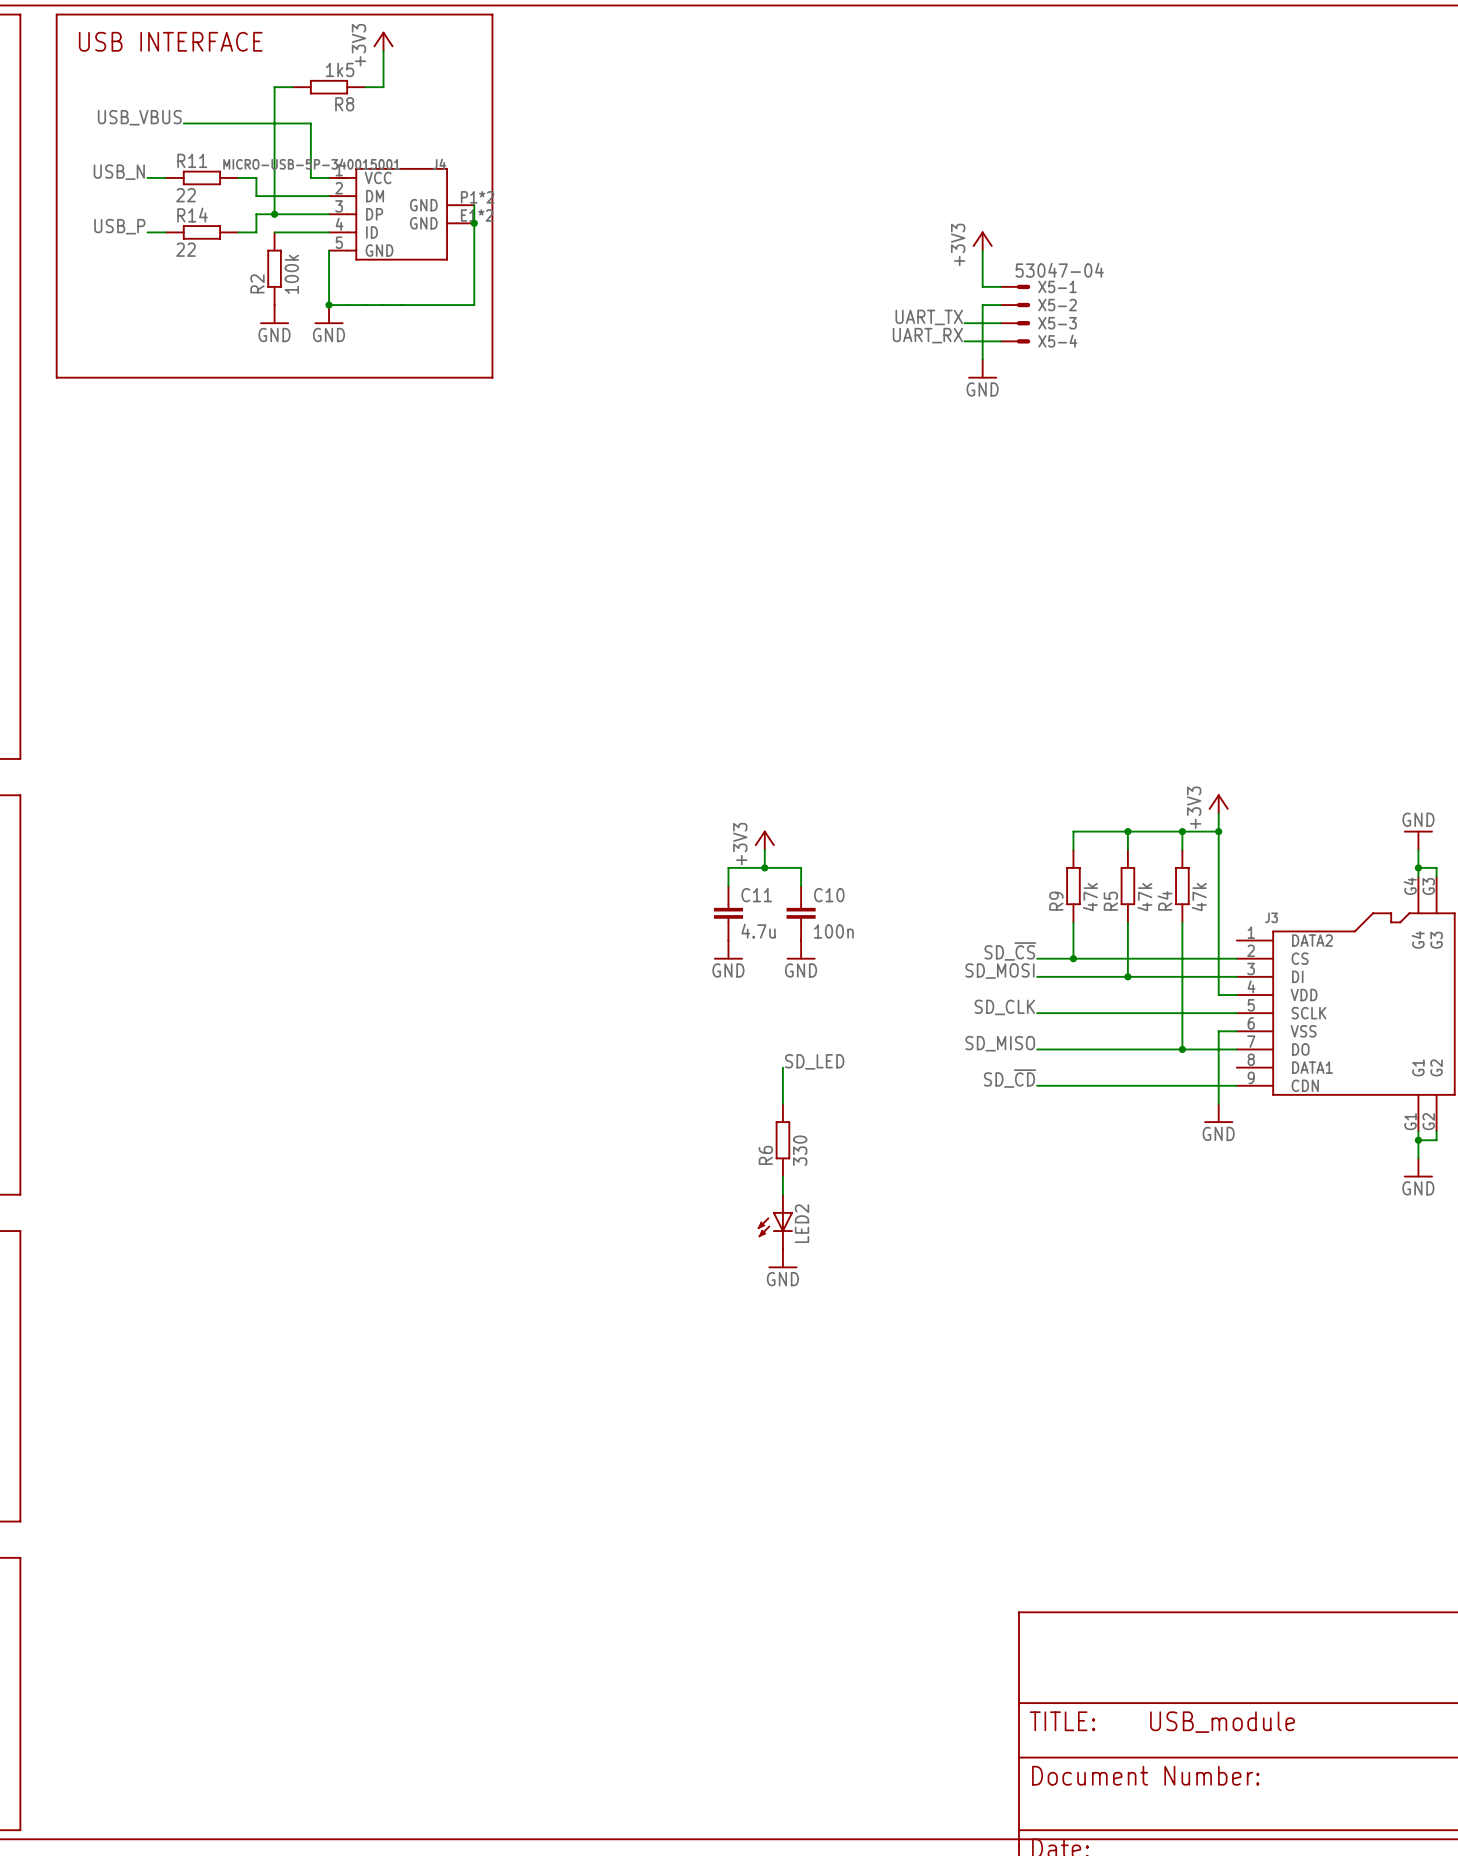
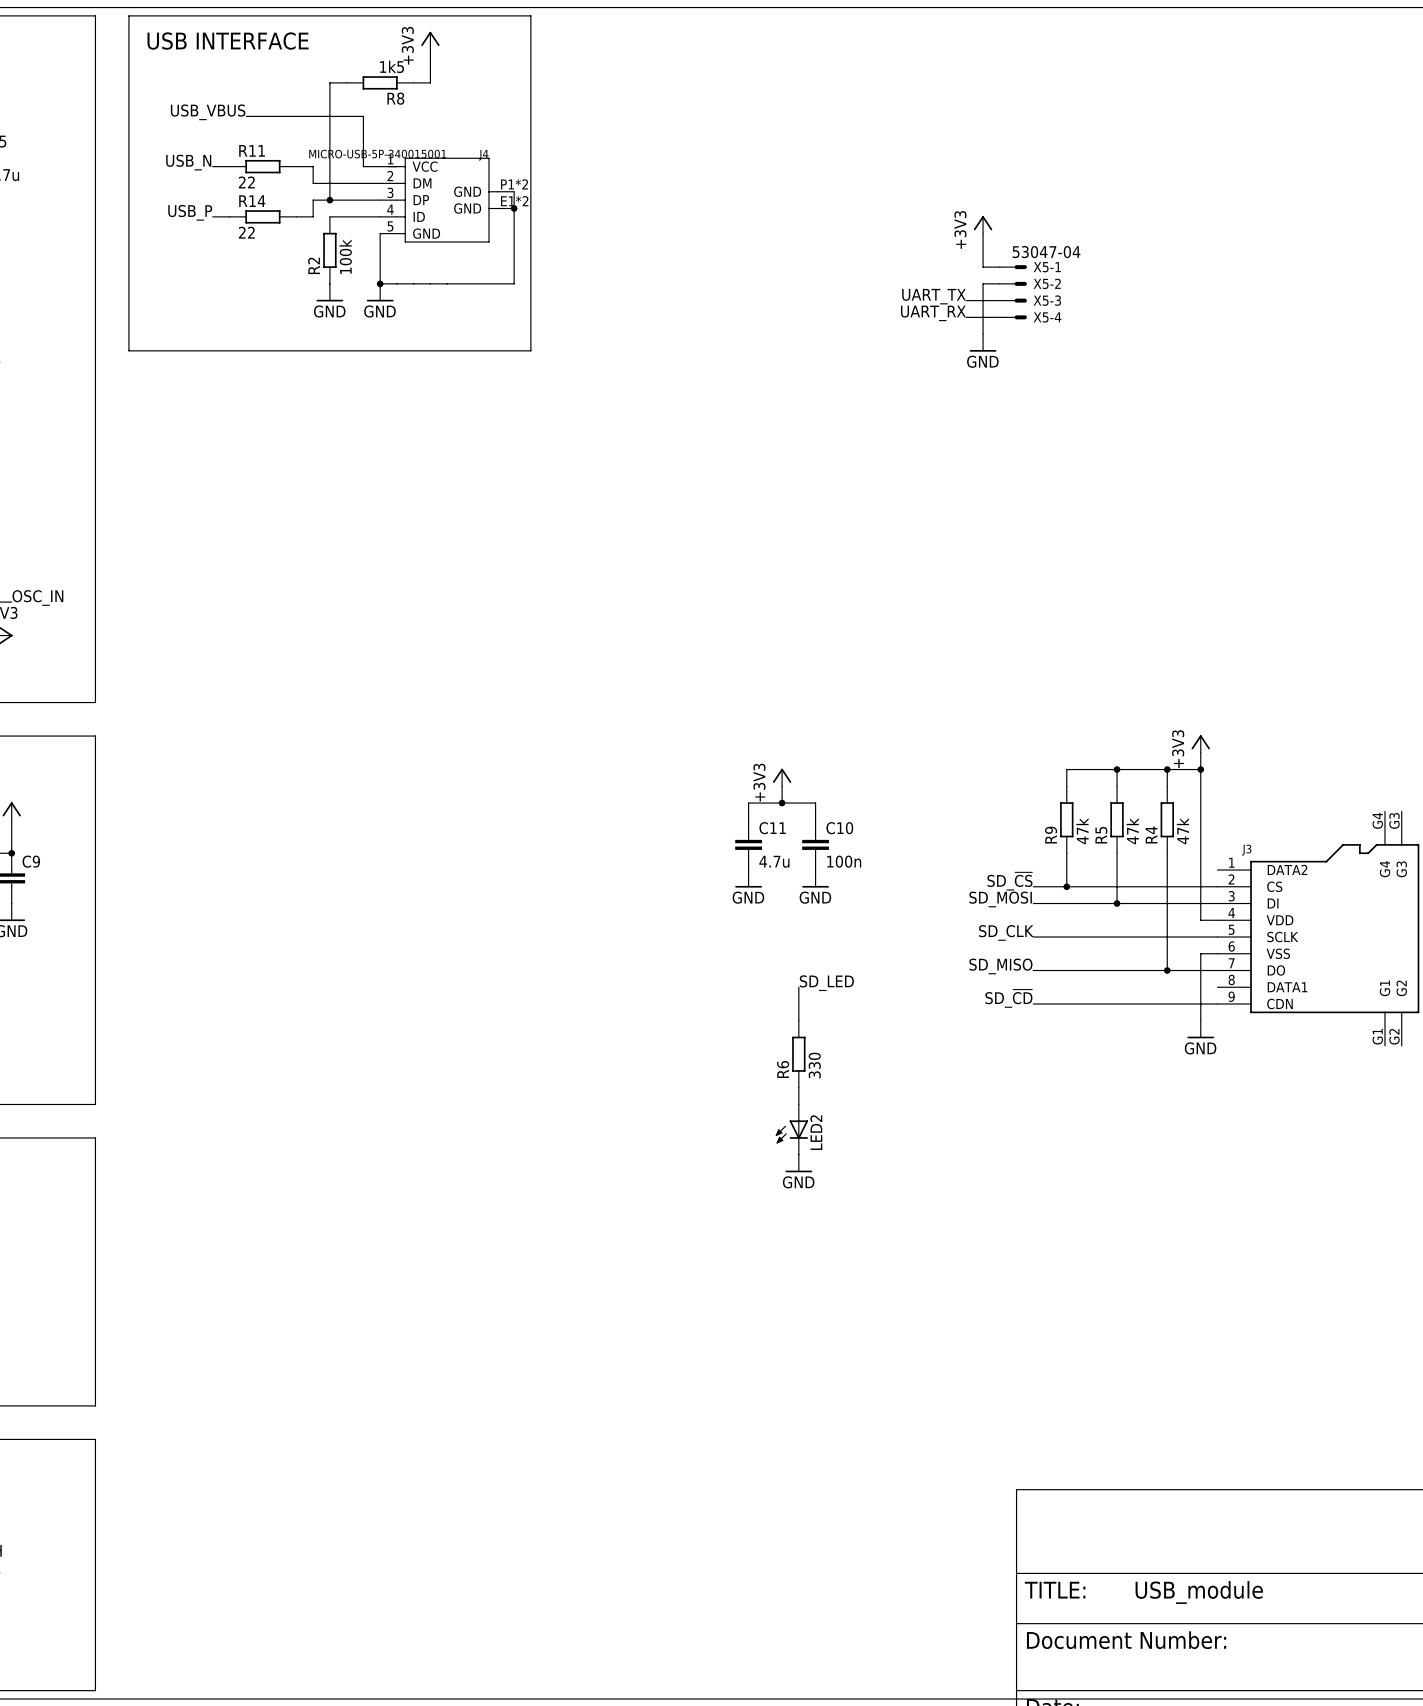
power symbol: GND (1418, 840) -> none
wire: (1418, 849) (1418, 876) -> none
wire: (1418, 867) (1436, 867) (1436, 876) -> none
junction: (1418, 867) -> none
wire: (1418, 1131) (1418, 1158) -> none
wire: (1436, 1131) (1436, 1140) (1418, 1140) -> none
junction: (1418, 1140) -> none
power symbol: GND (1418, 1167) -> none

